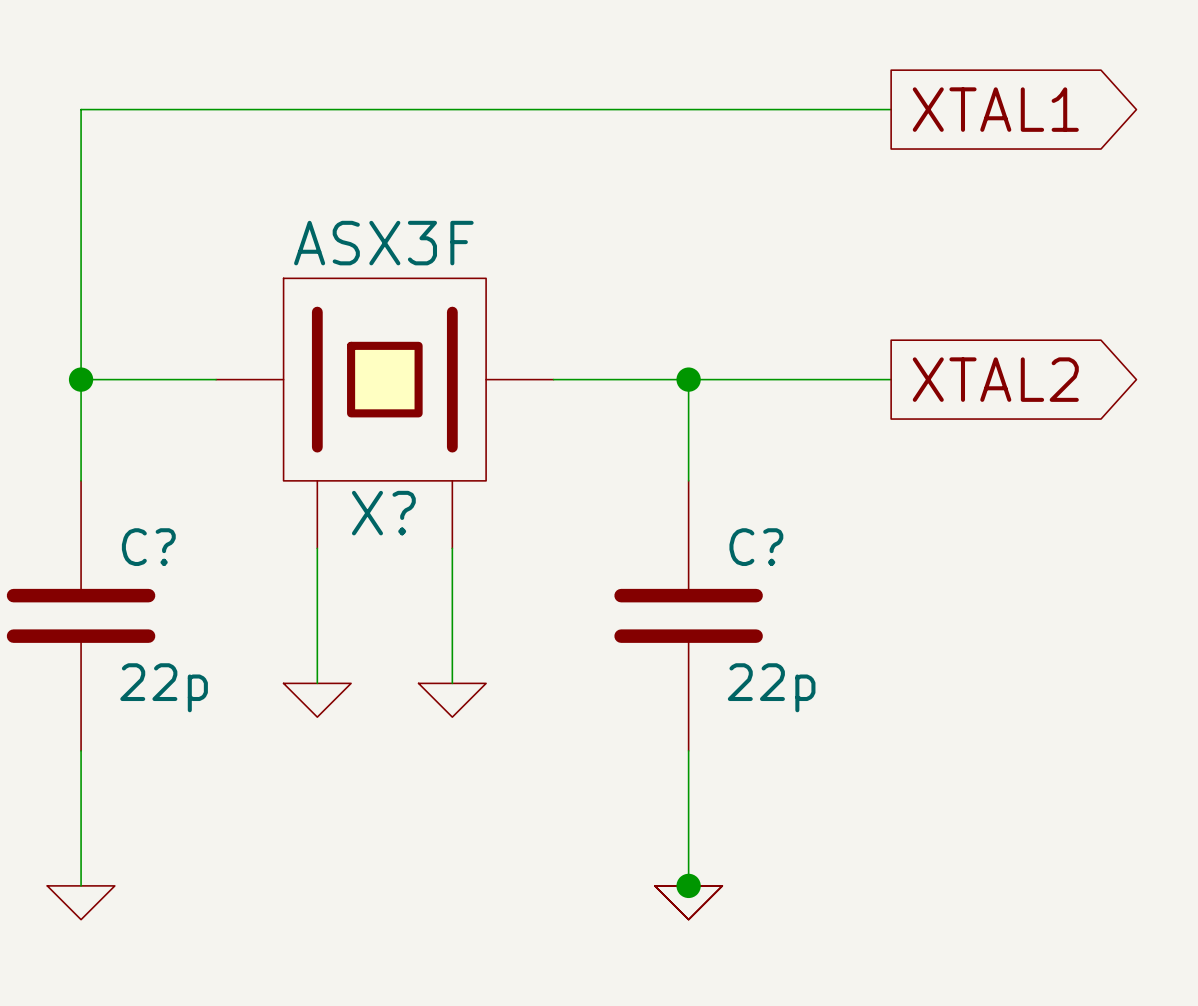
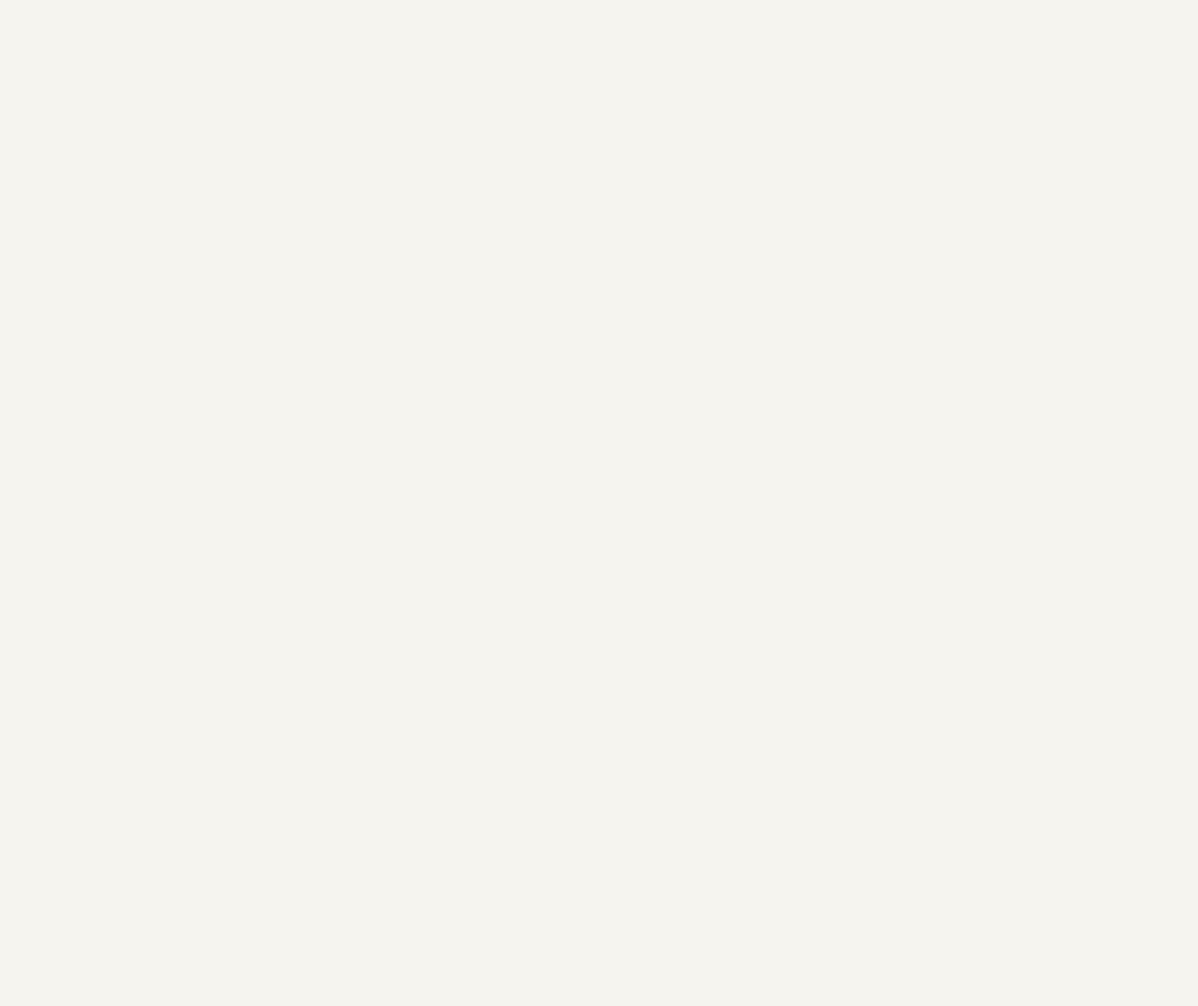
wire: (891, 109) (81, 109) (81, 480) -> none
global label: XTAL1 (995, 109) -> none
wire: (81, 379) (216, 379) -> none
junction: (81, 379) -> none
wire: (553, 379) (891, 379) -> none
wire: (688, 379) (688, 480) -> none
junction: (688, 379) -> none
global label: XTAL2 (995, 379) -> none
X?: ASX3F (384, 413) -> none
wire: (317, 548) (317, 683) -> none
wire: (452, 548) (452, 683) -> none
C?: 22p (81, 615) -> none
C?: 22p (688, 615) -> none
power symbol: (317, 700) -> none
power symbol: (452, 700) -> none
wire: (81, 750) (81, 885) -> none
wire: (688, 750) (688, 885) -> none
junction: (688, 885) -> none
power symbol: (81, 902) -> none
power symbol: (688, 902) -> none

